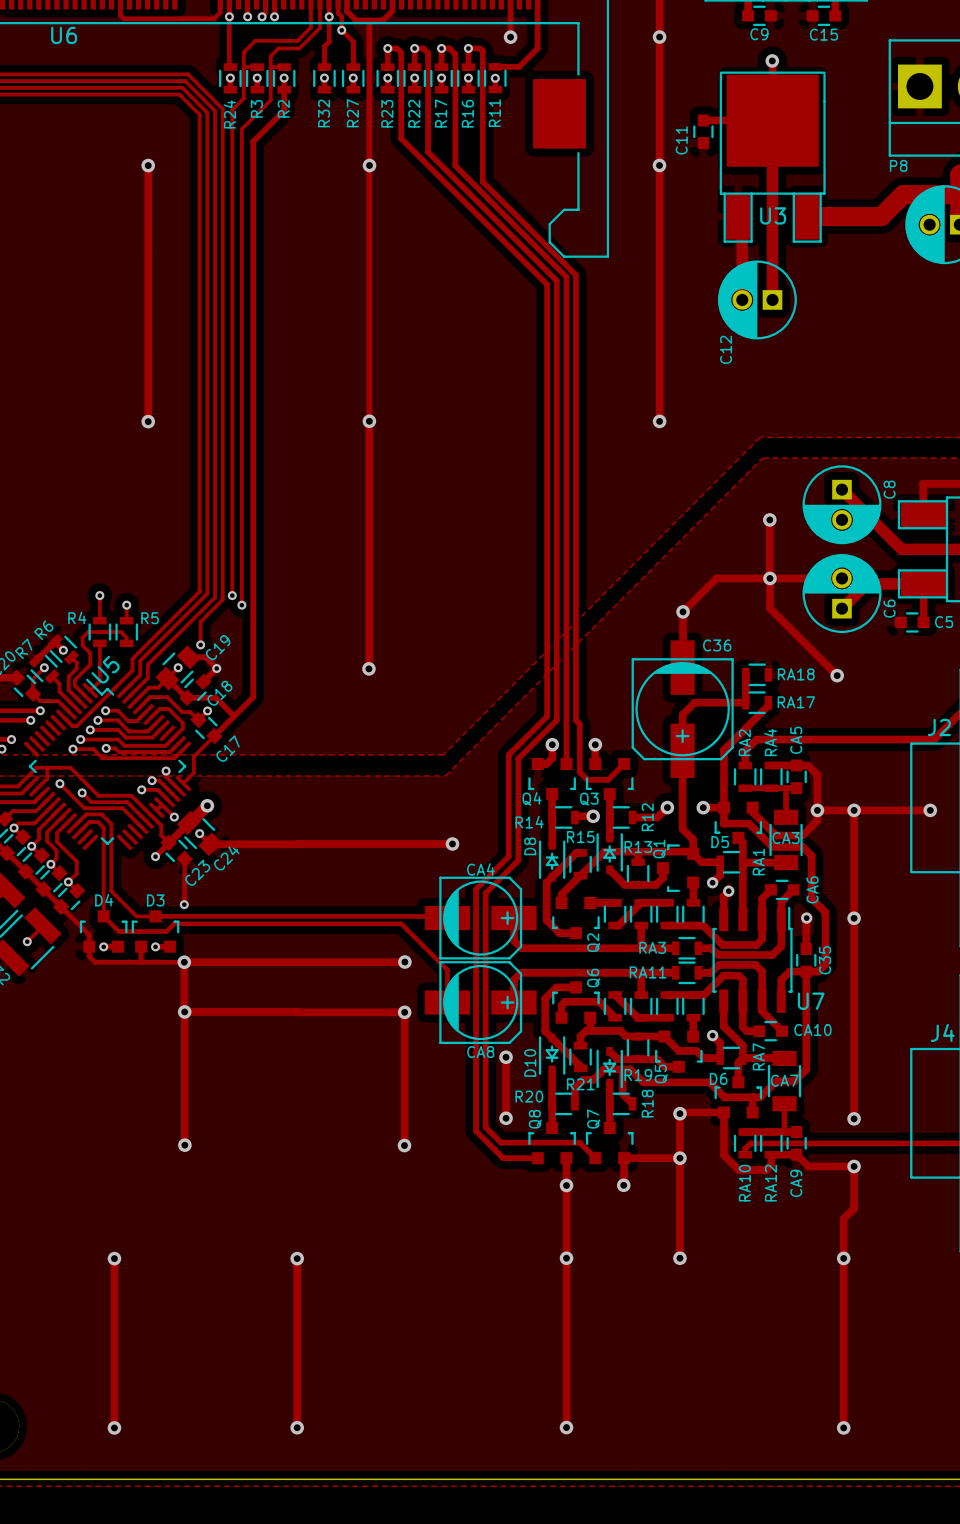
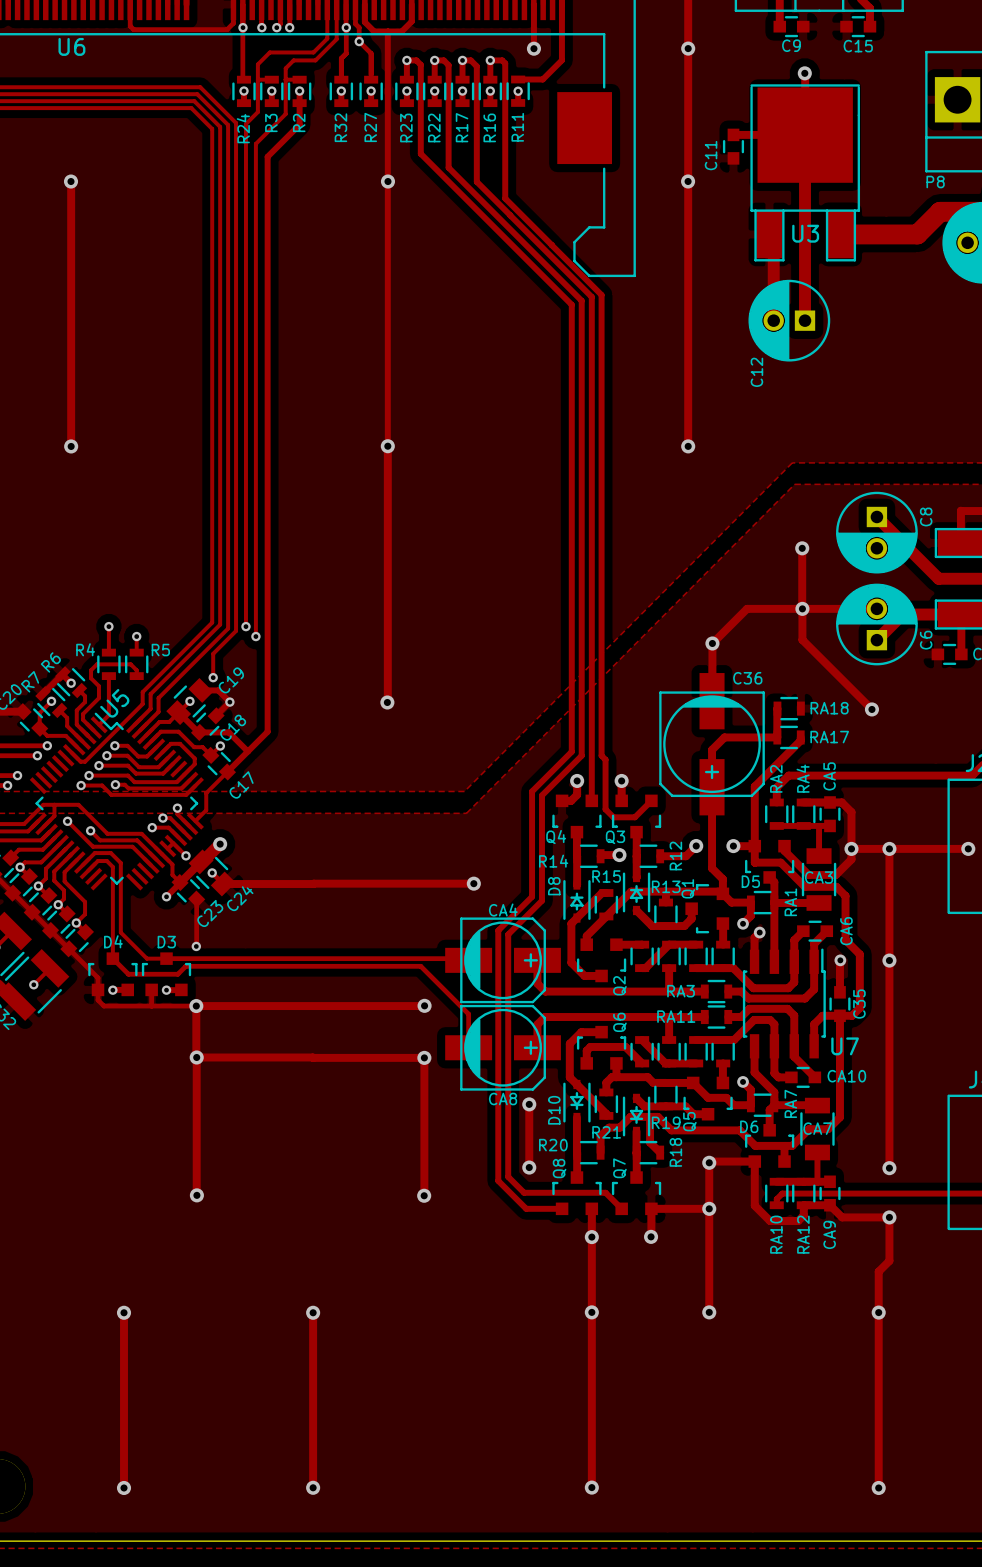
track: (148, 165) (148, 421) -> (71, 181) (71, 446)
via position: (148, 165) -> (71, 181)
via position: (148, 421) -> (71, 446)

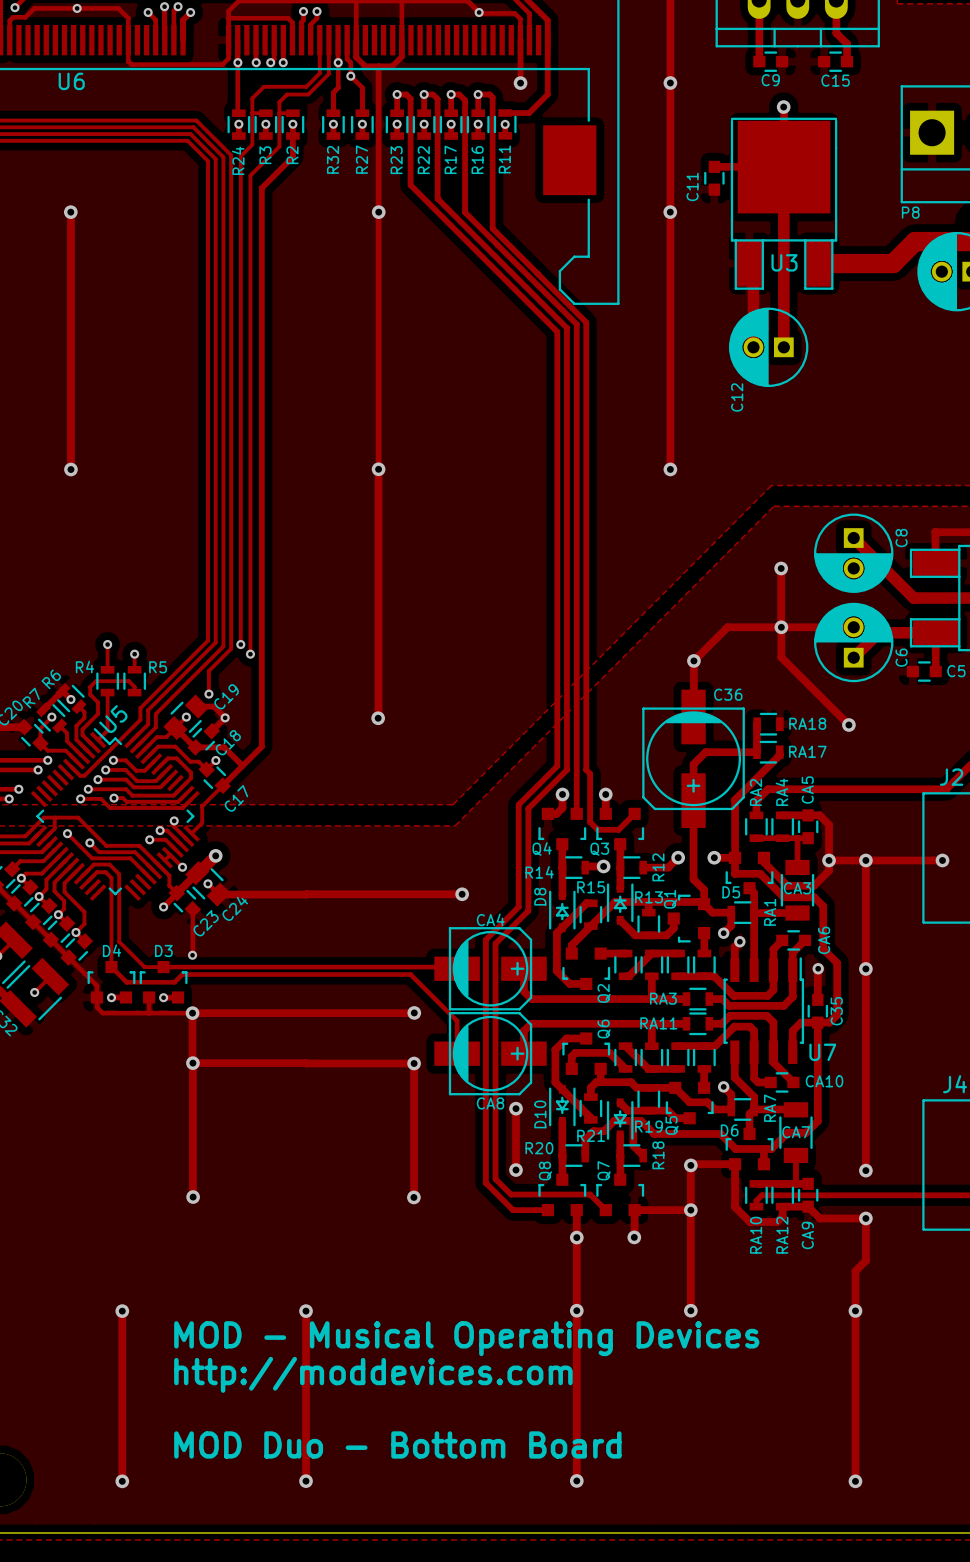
text: none -> MOD - Musical Operating Devices (466, 1338)
text: none -> http://moddevices.com (373, 1374)
text: none -> MOD Duo - Bottom Board (397, 1444)

